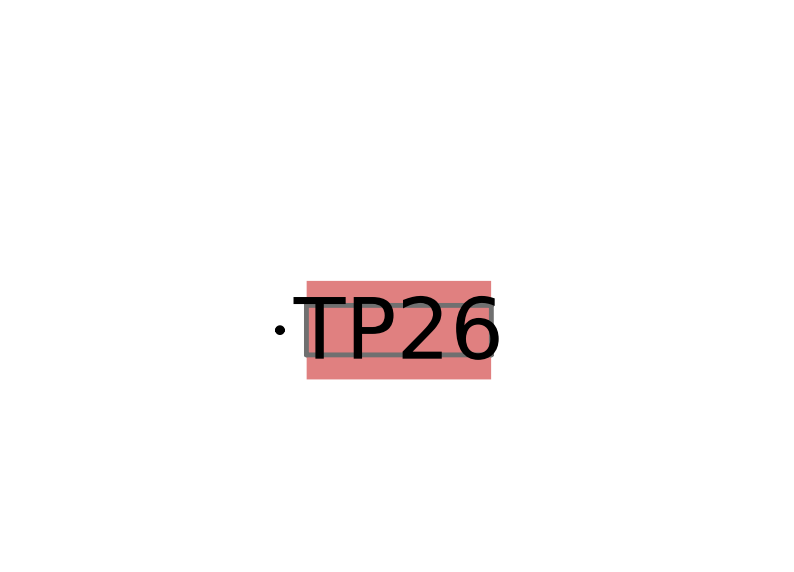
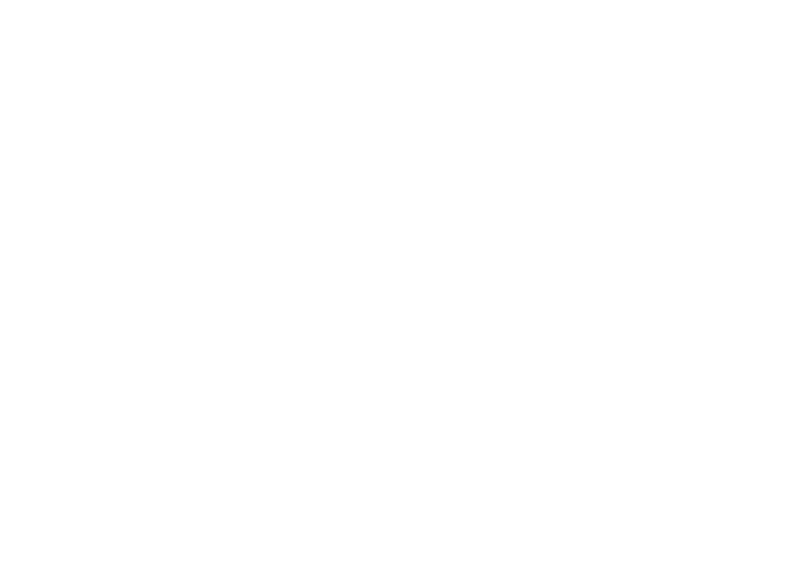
TP26: (384, 330) -> none

